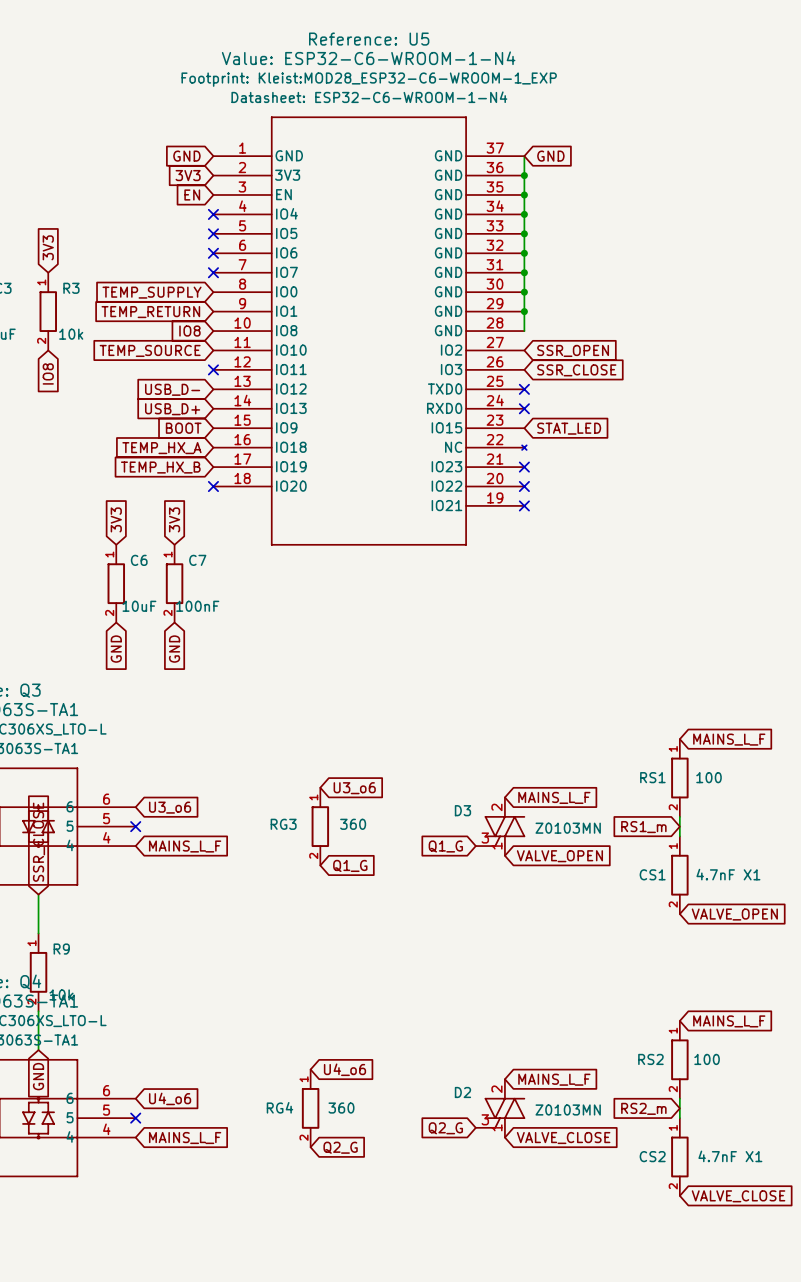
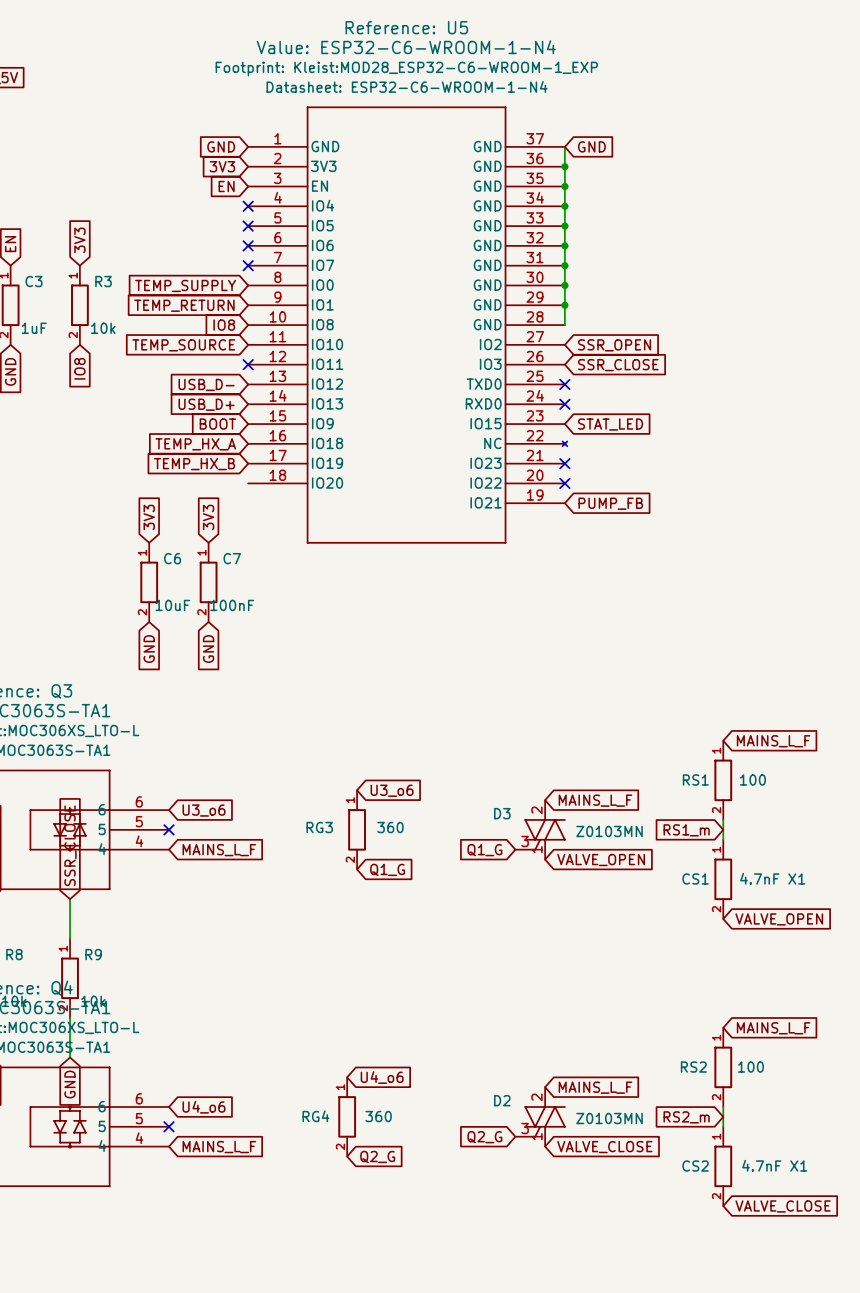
no-connect mark: (213, 486) -> none
no-connect mark: (524, 505) -> none
global label: none -> PUMP_FB (610, 503)

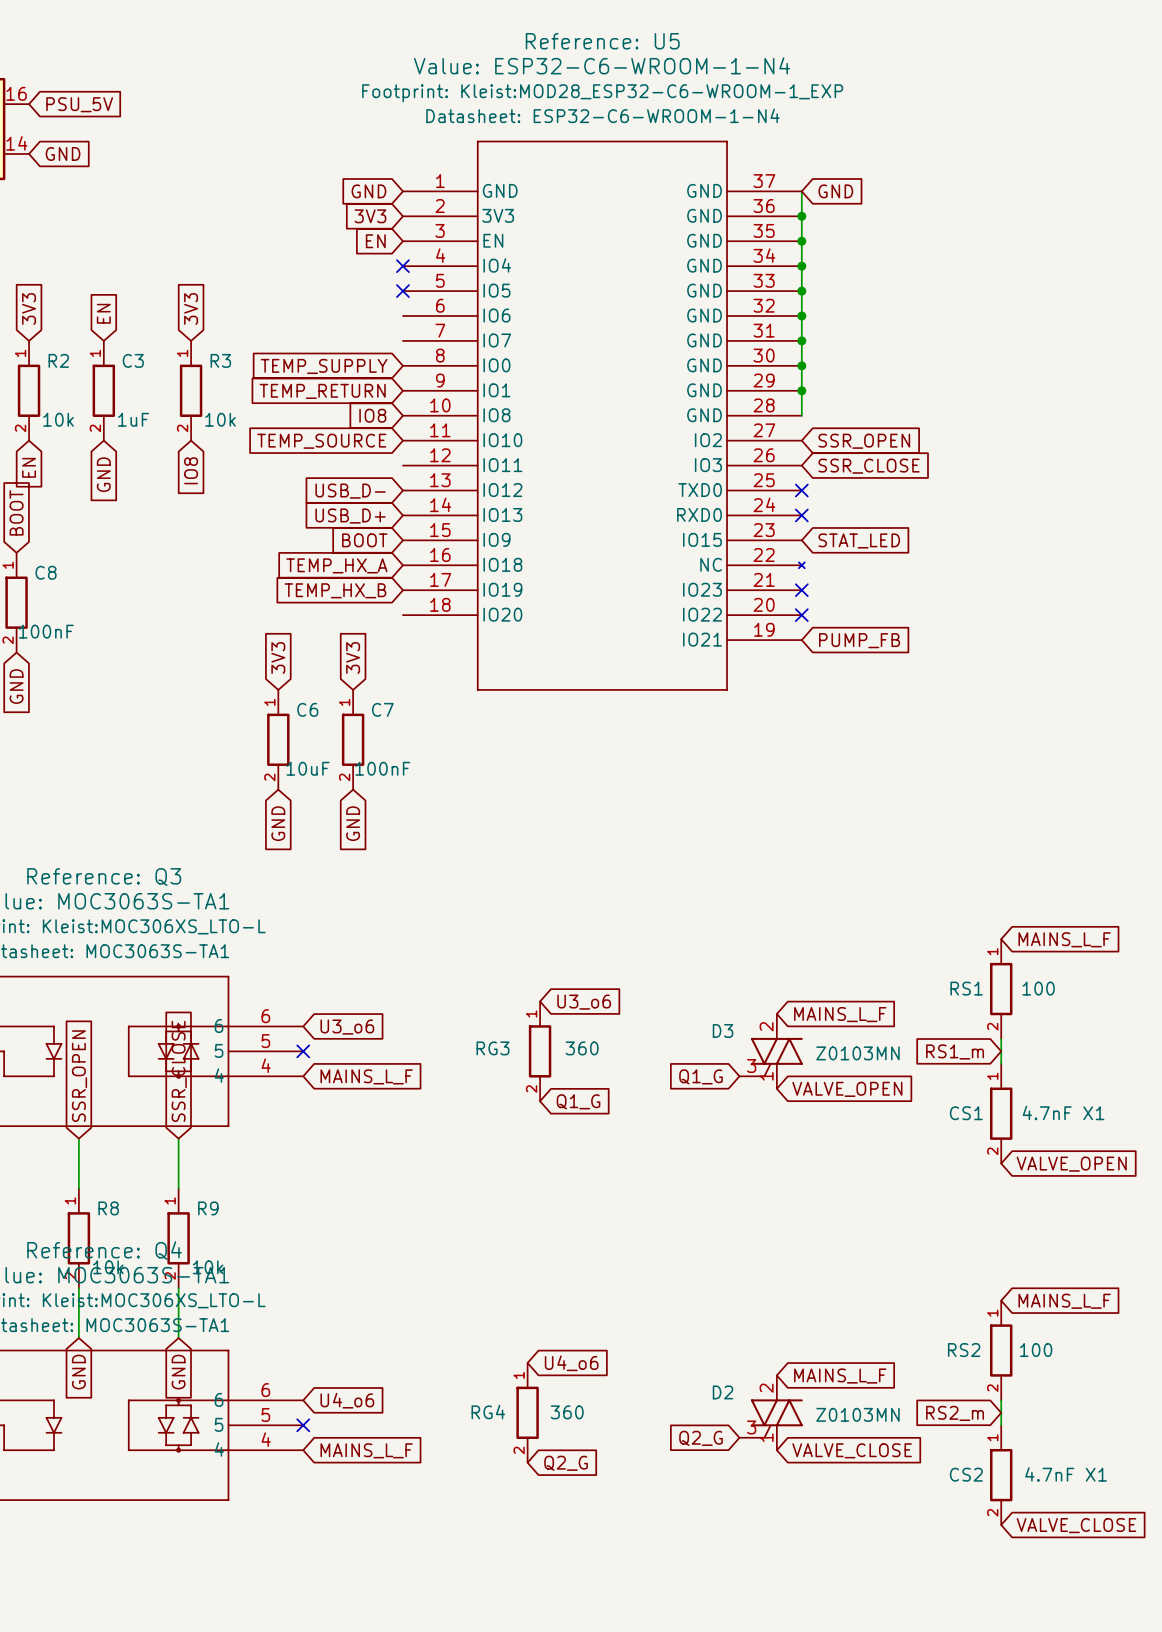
no-connect mark: (248, 245) -> none
no-connect mark: (248, 265) -> none
no-connect mark: (248, 364) -> none

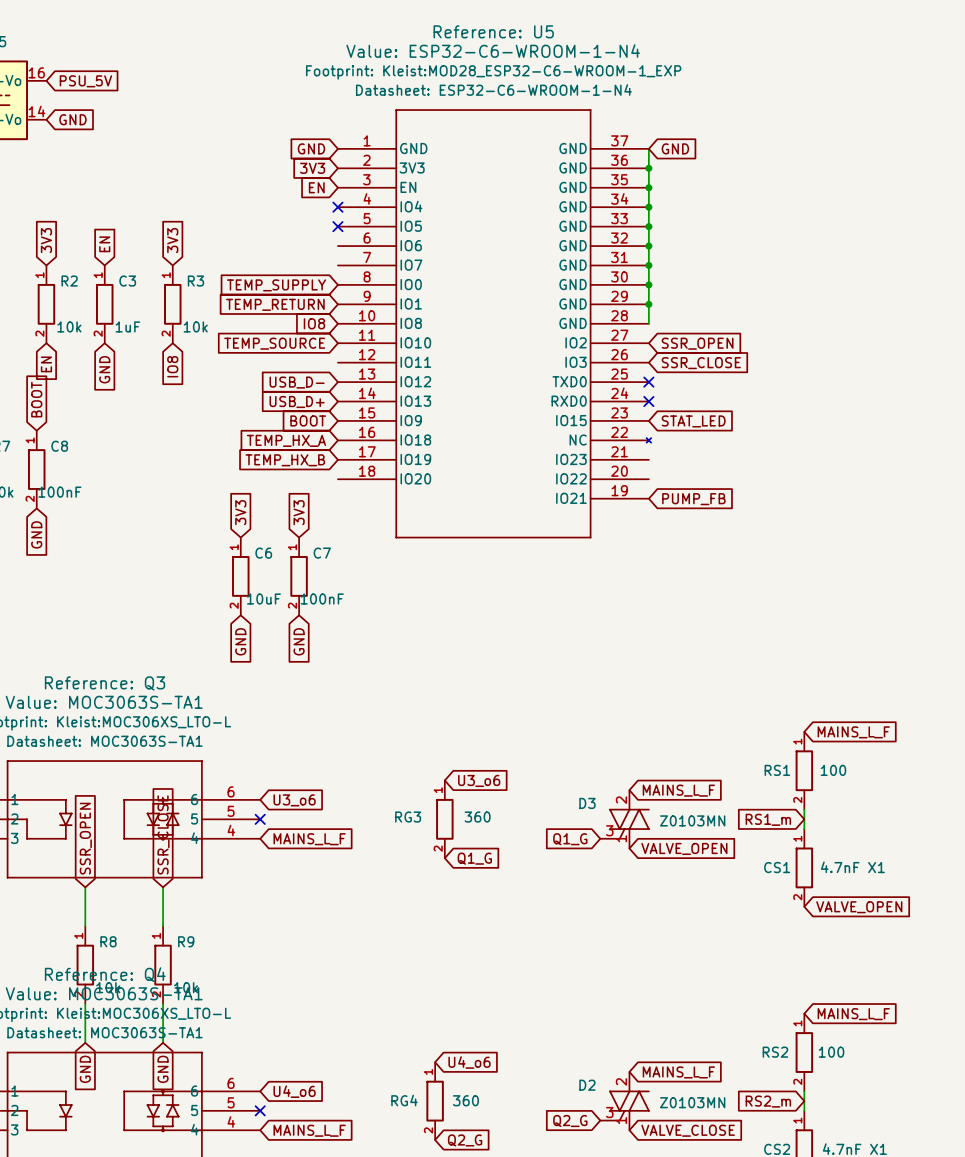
no-connect mark: (801, 590) -> none
no-connect mark: (801, 615) -> none

